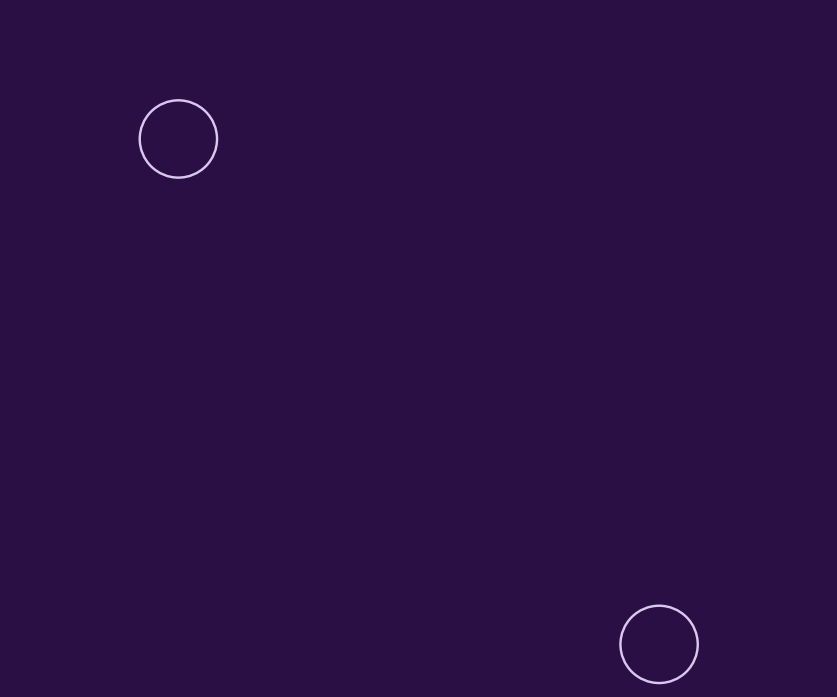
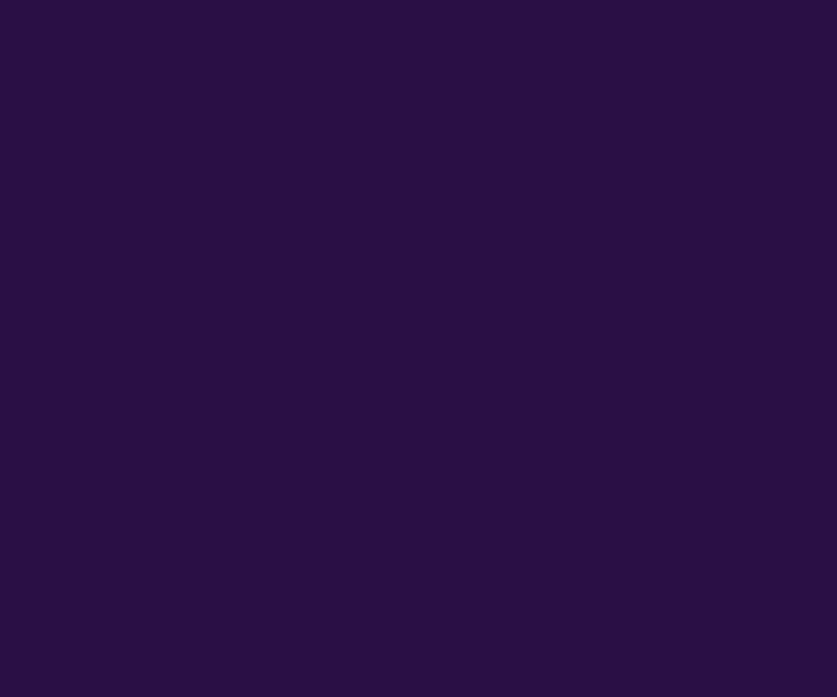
round board edge: [138, 99, 219, 179] -> none
round board edge: [619, 604, 699, 685] -> none

